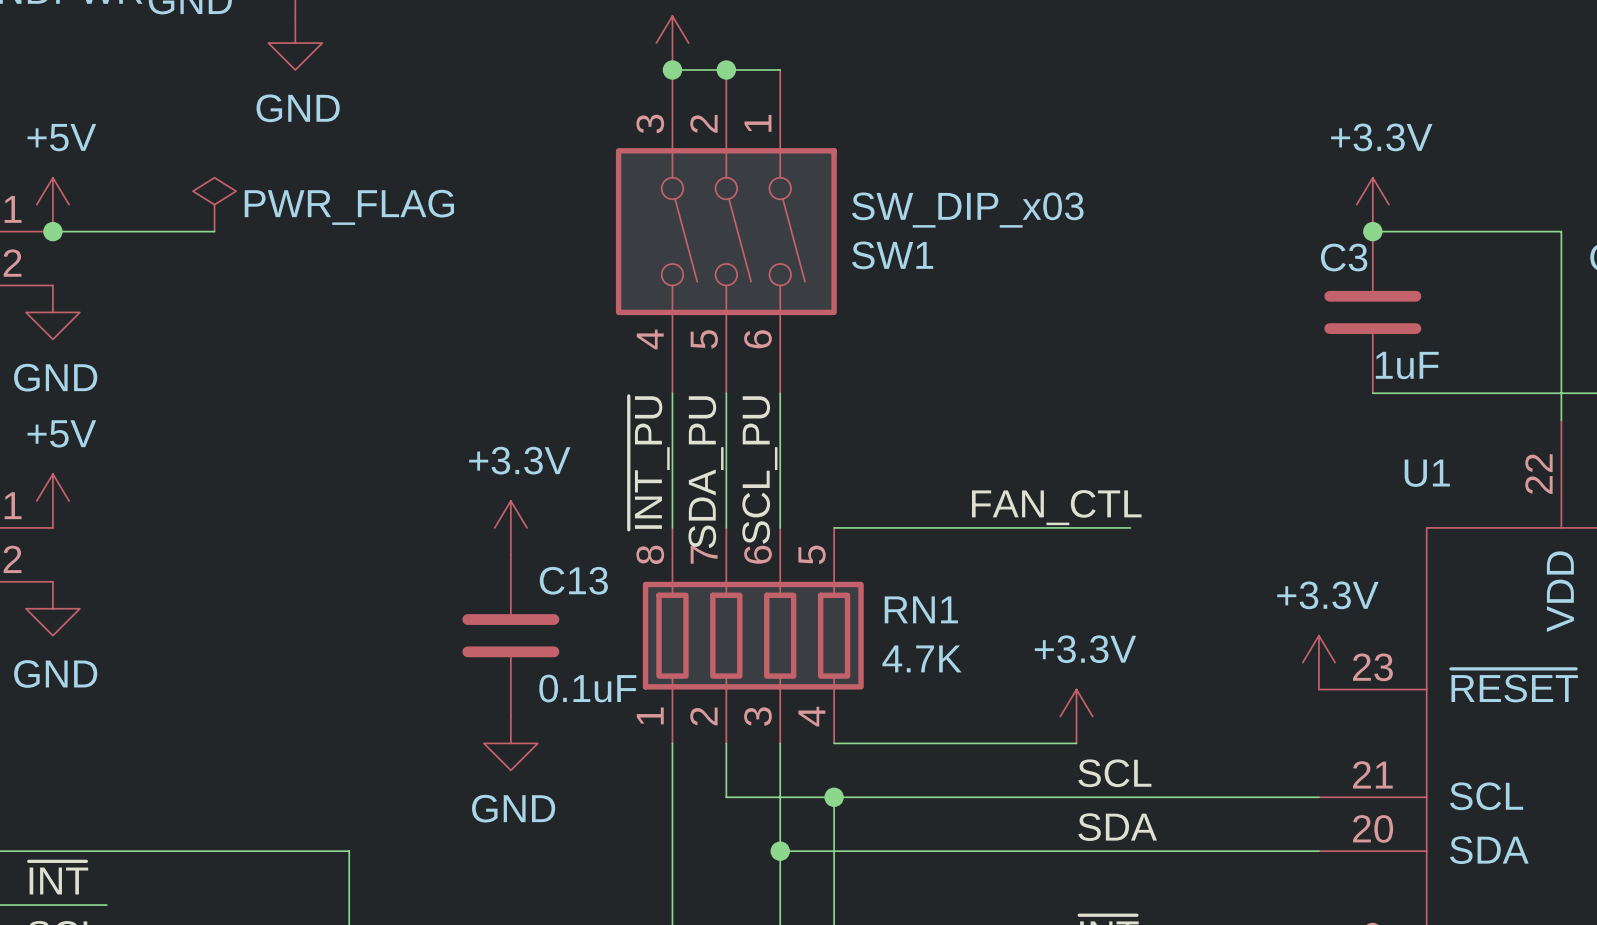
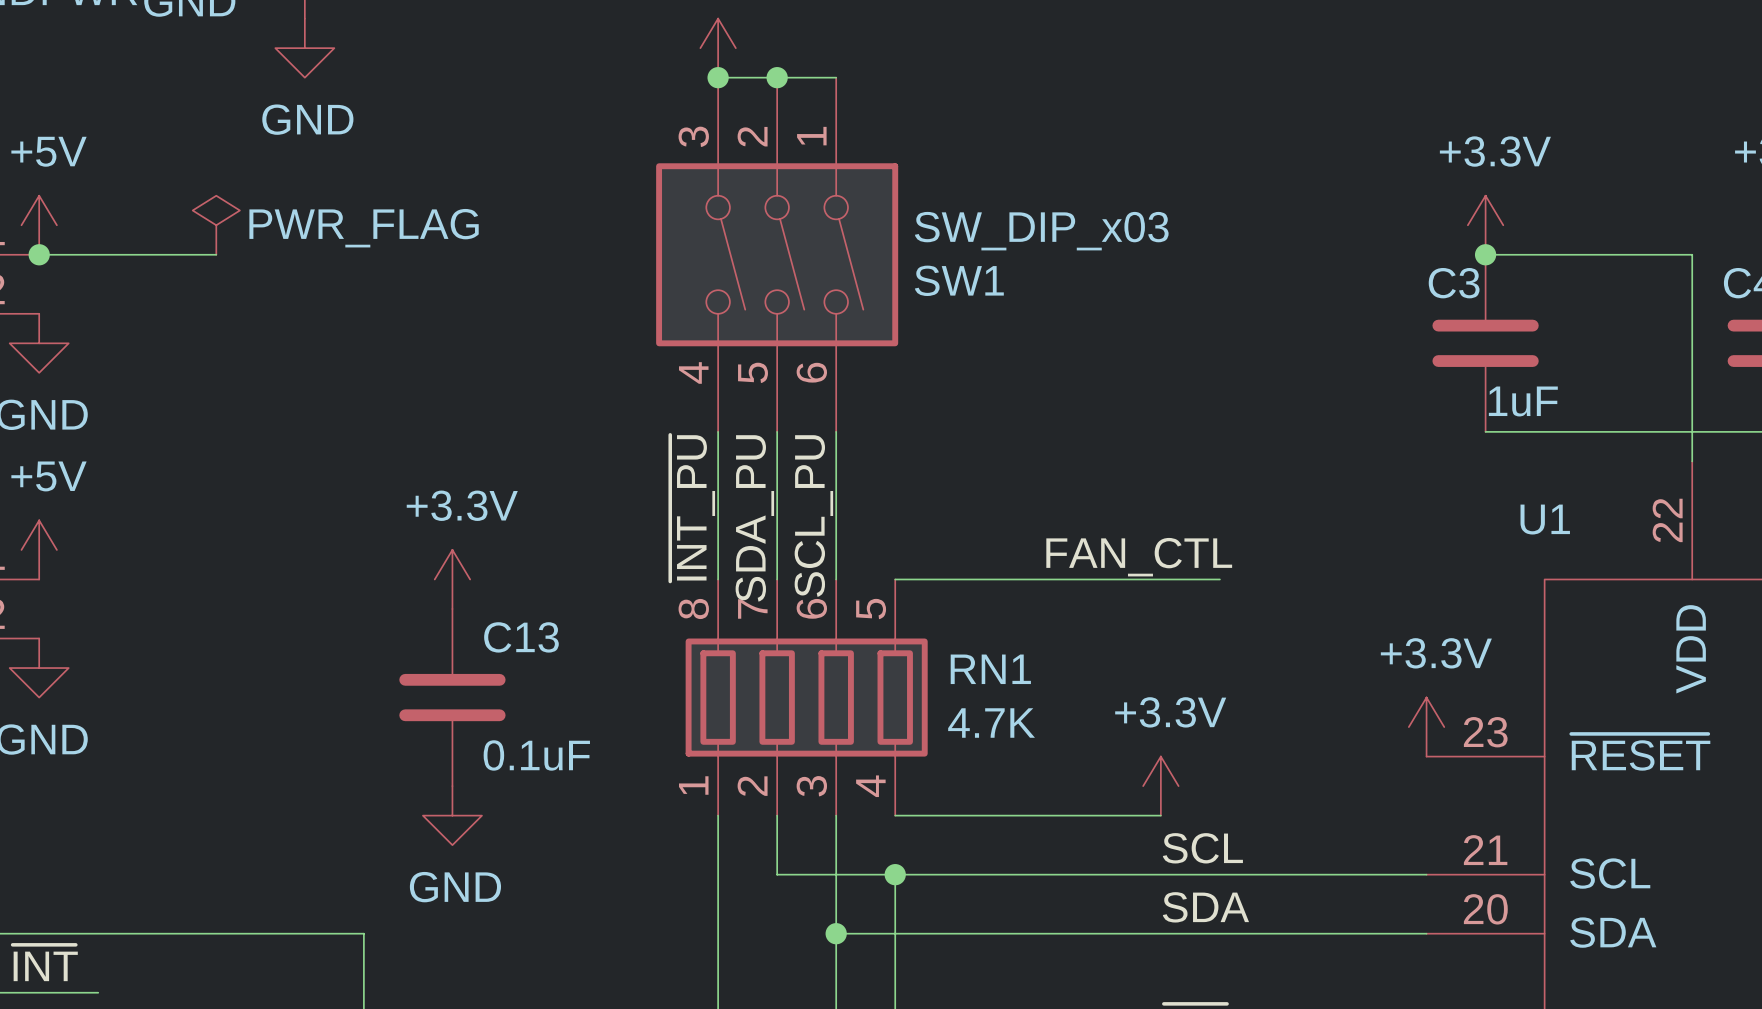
power symbol position: +3.3V (510, 527) -> +3.3V (452, 579)
C13 position: (510, 635) -> (452, 697)
power symbol position: GND (510, 743) -> GND (452, 815)

